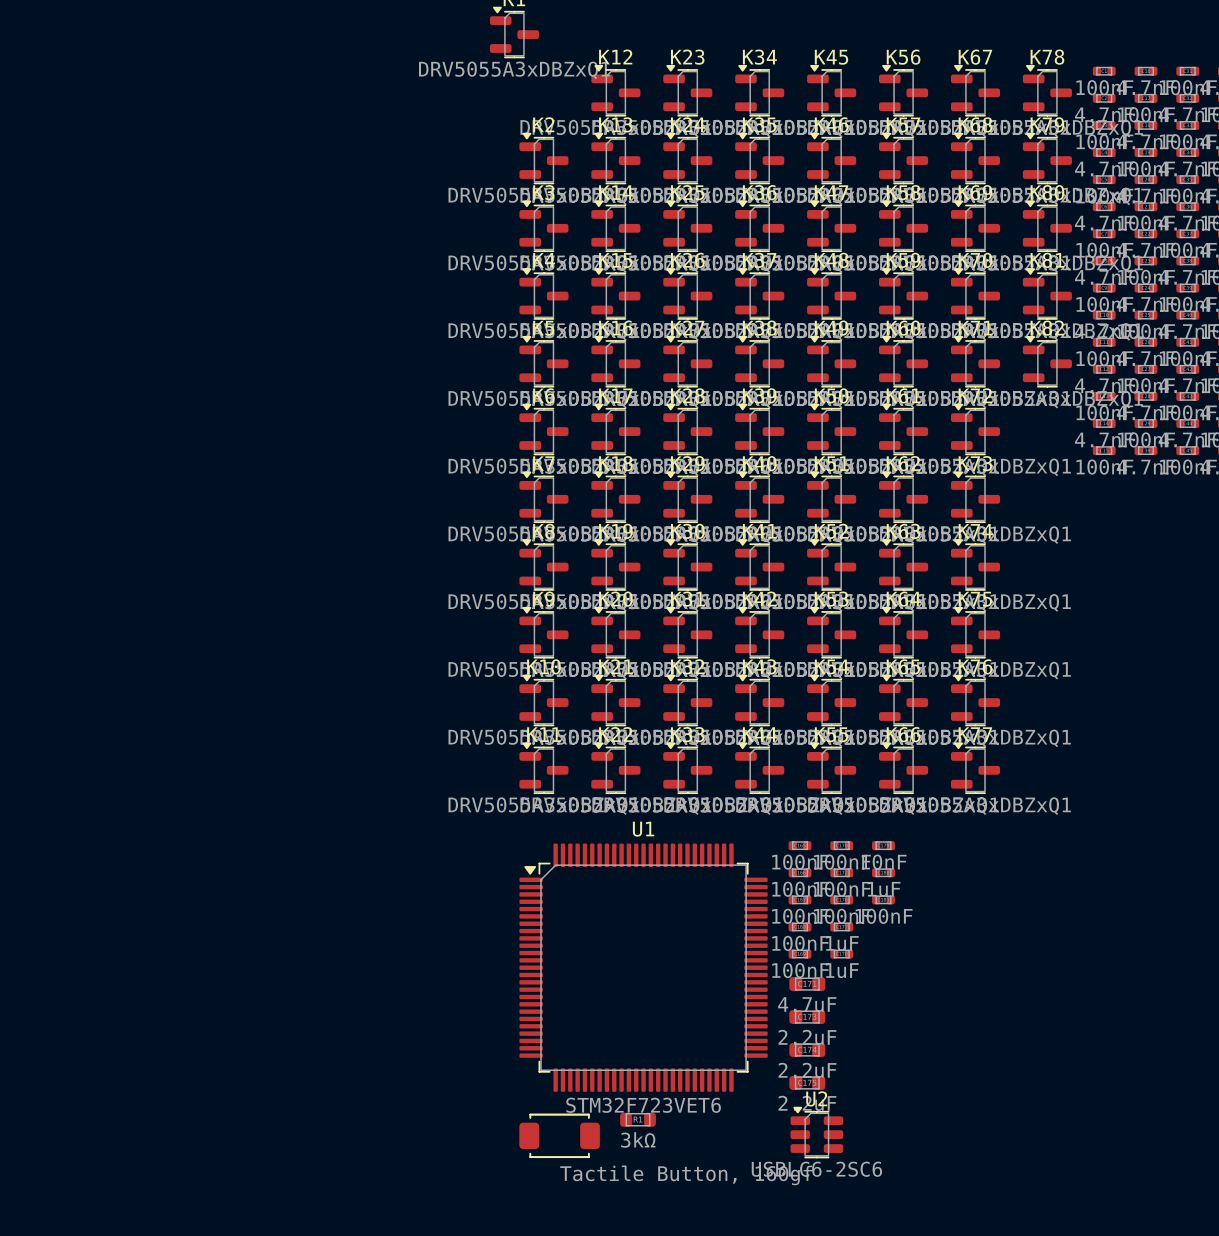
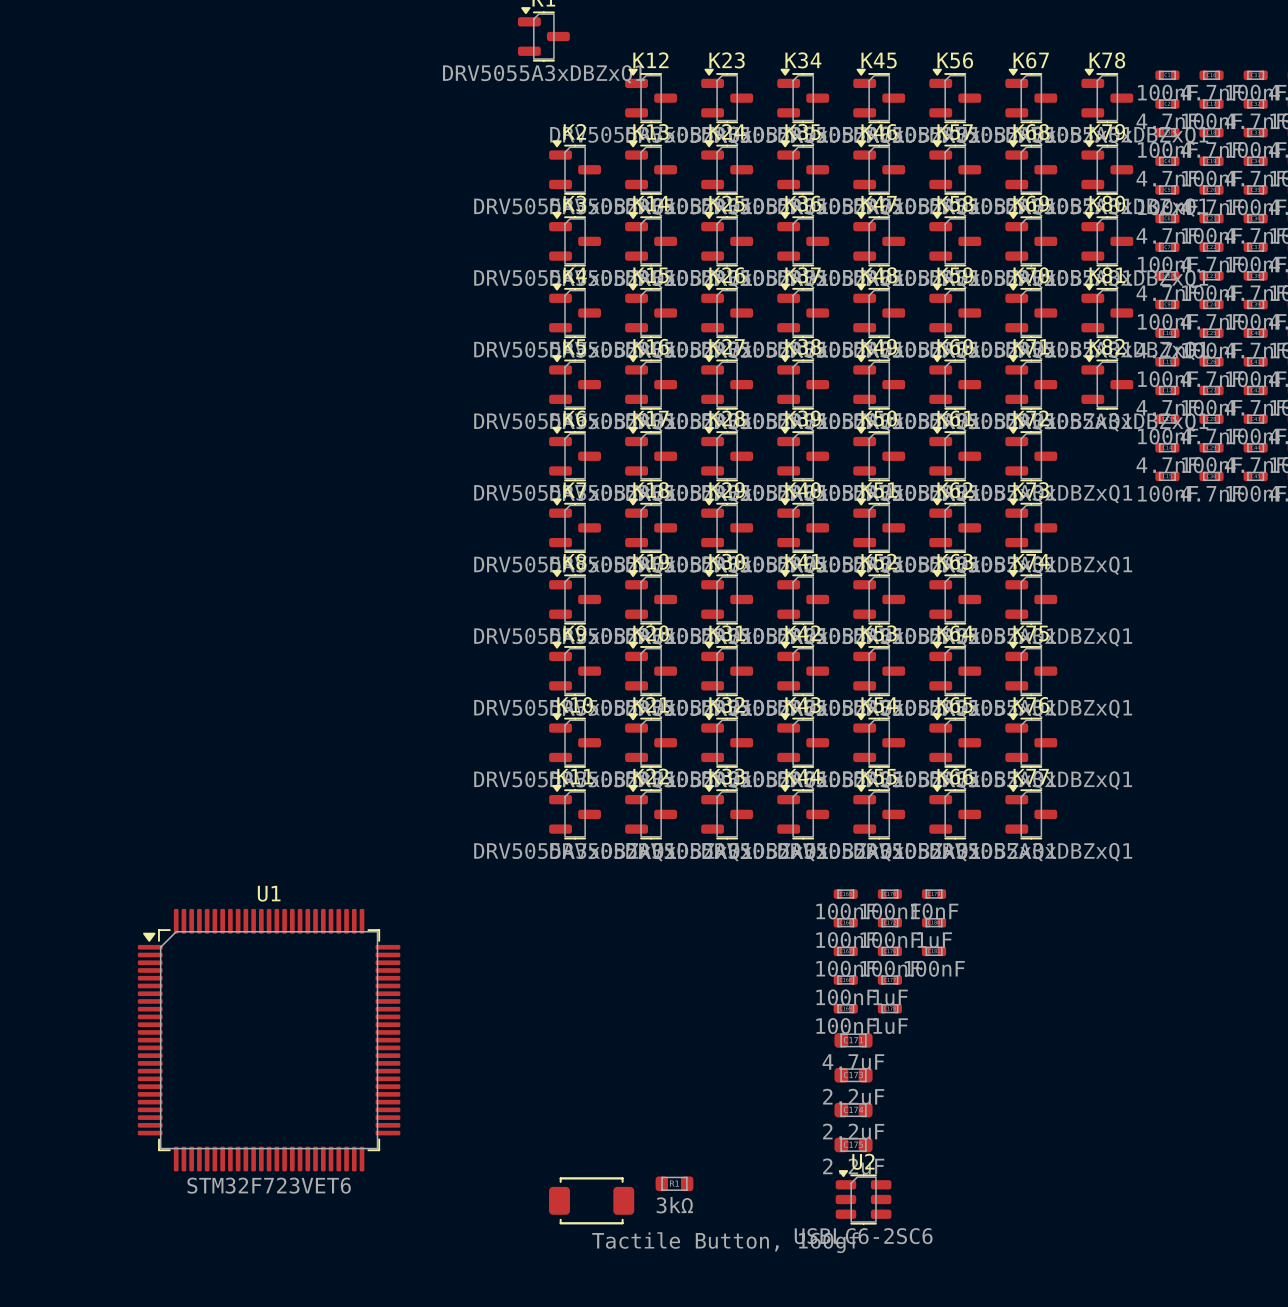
U1 position: (643, 967) -> (269, 1040)

